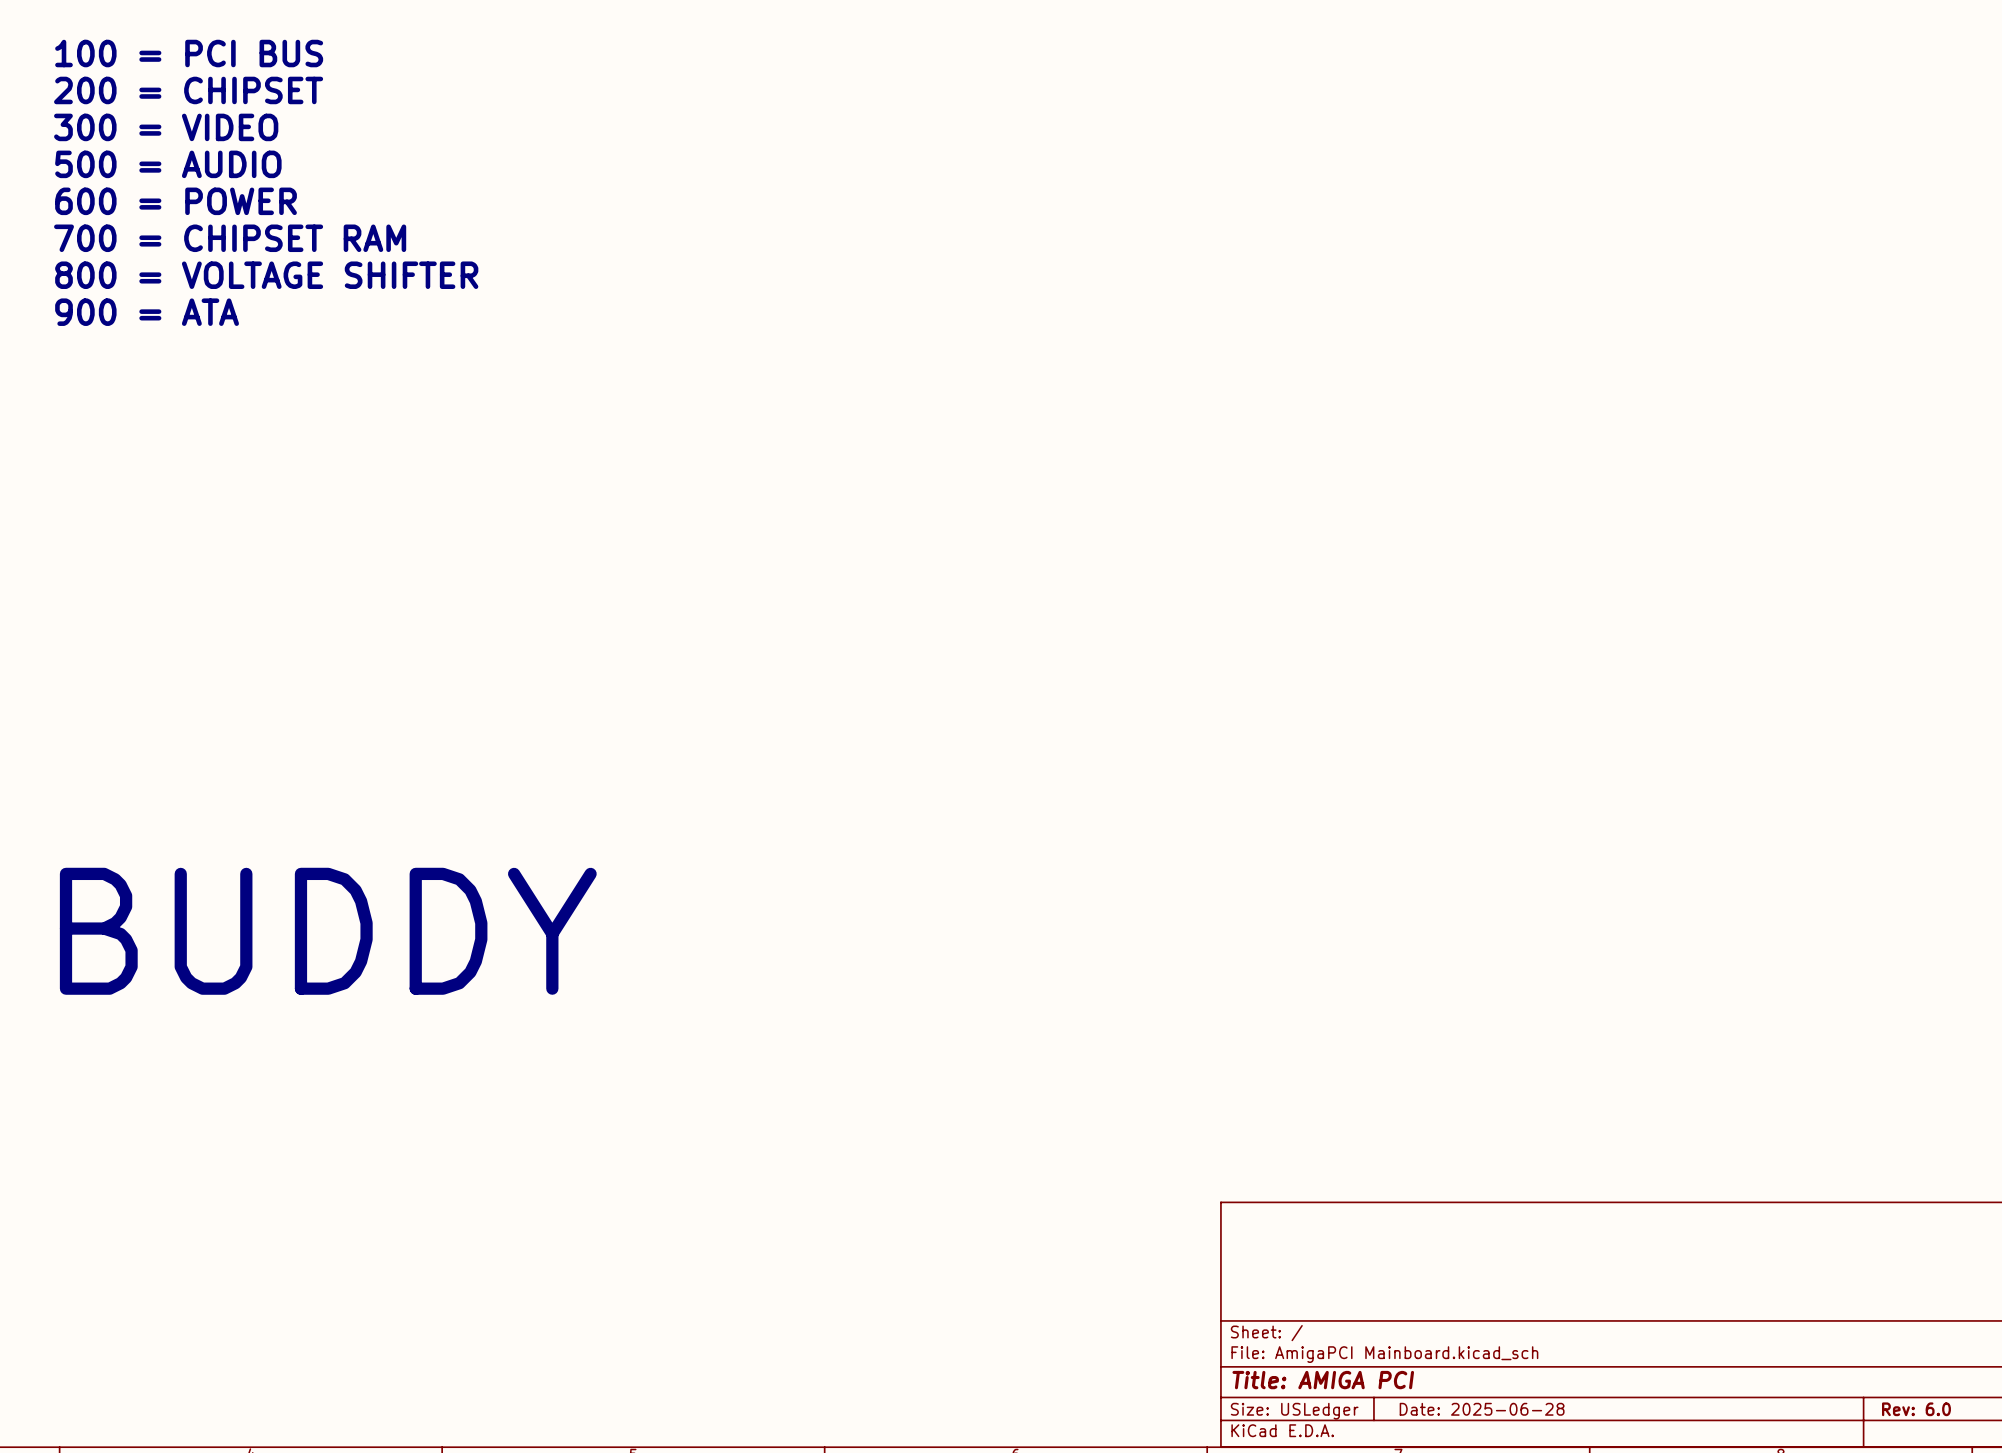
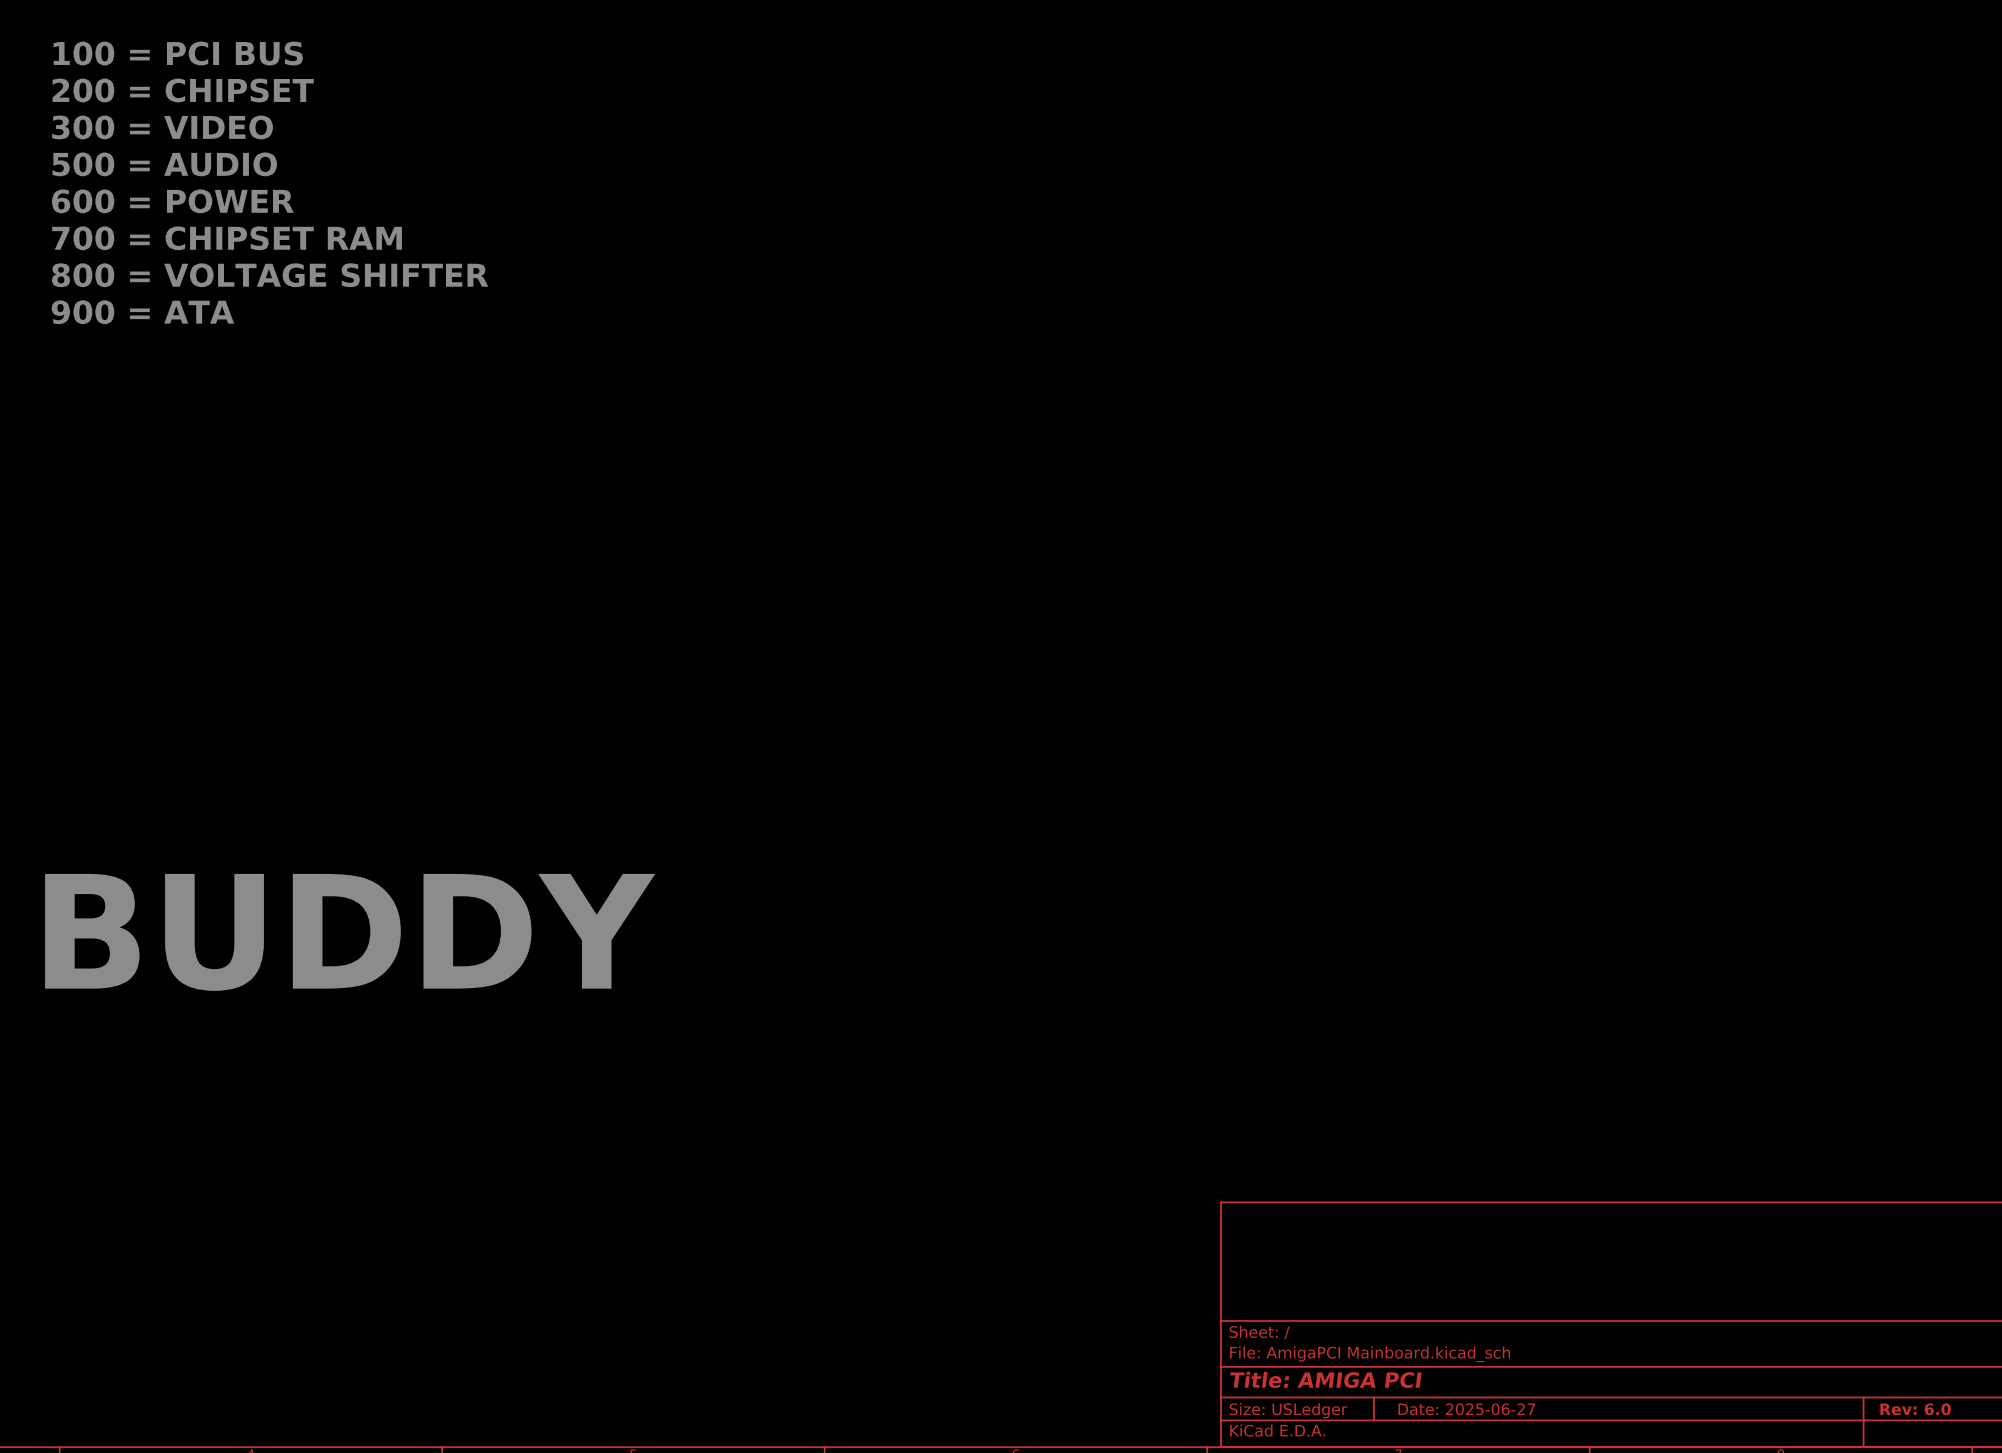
title block: Date: 2025-06-28 (1482, 1409) -> Date: 2025-06-27 (1466, 1409)

